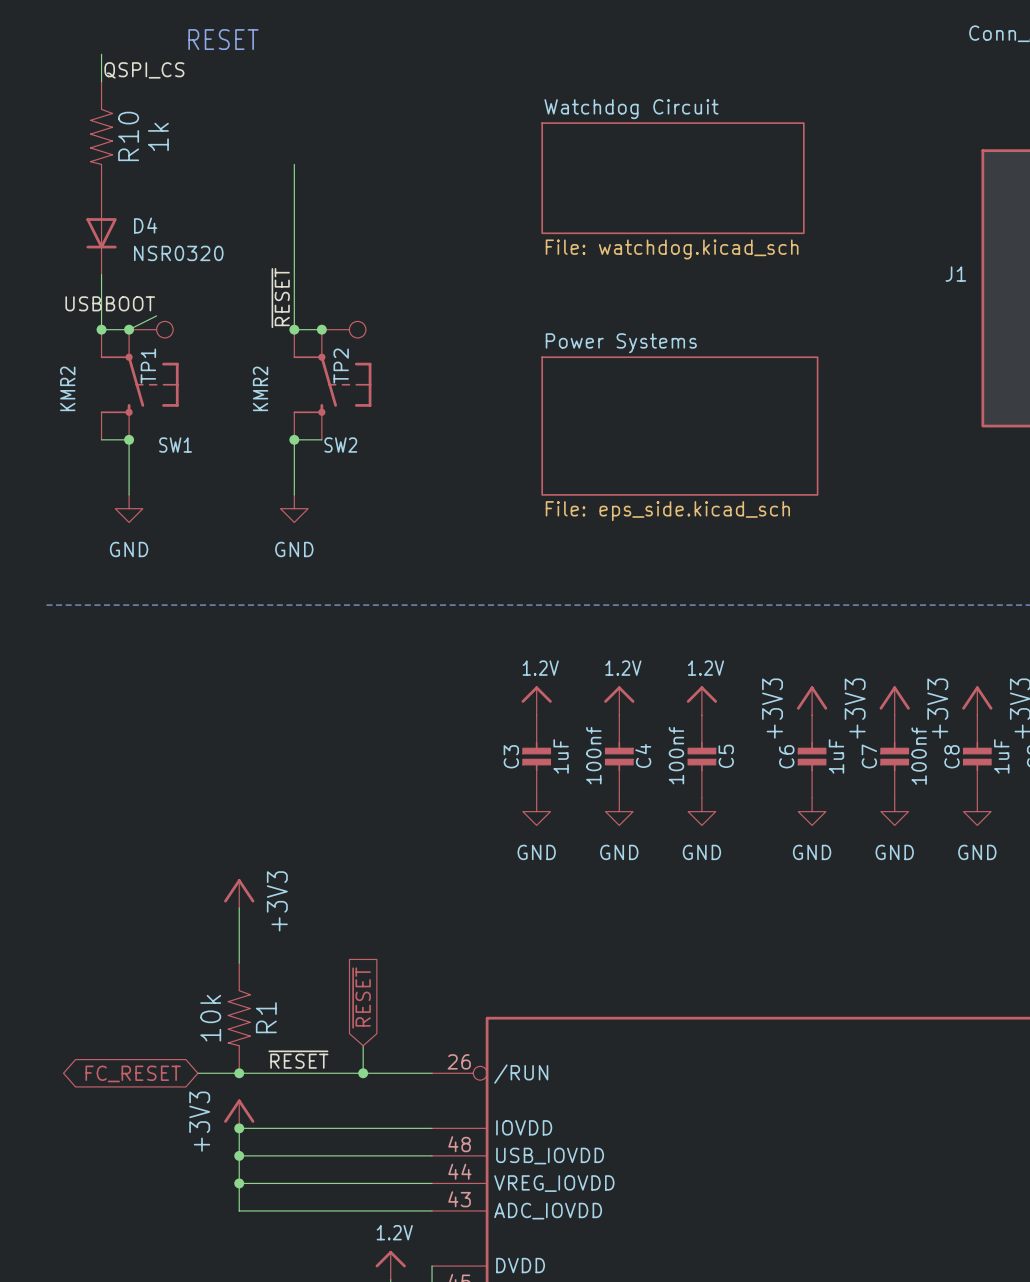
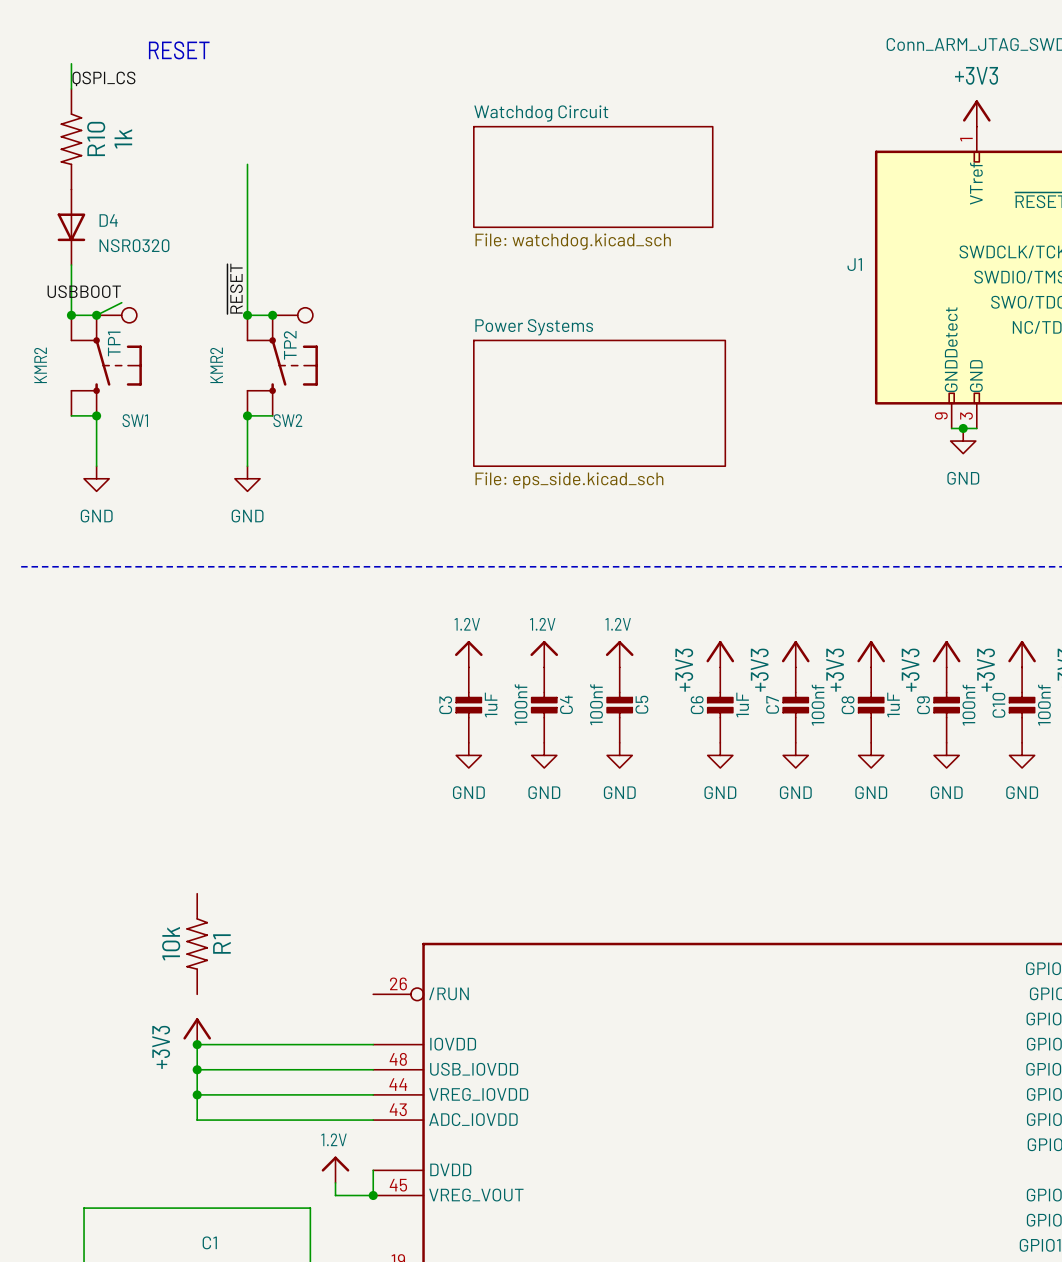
power symbol: +3V3 (239, 893) -> none
wire: (239, 908) (239, 963) -> none
global label: ~{RESET} (361, 997) -> none
wire: (363, 1045) (363, 1073) -> none
label: ~{RESET} (298, 1059) -> none
global label: FC_RESET (133, 1073) -> none
wire: (197, 1073) (432, 1073) -> none
junction: (239, 1073) -> none
junction: (363, 1073) -> none

